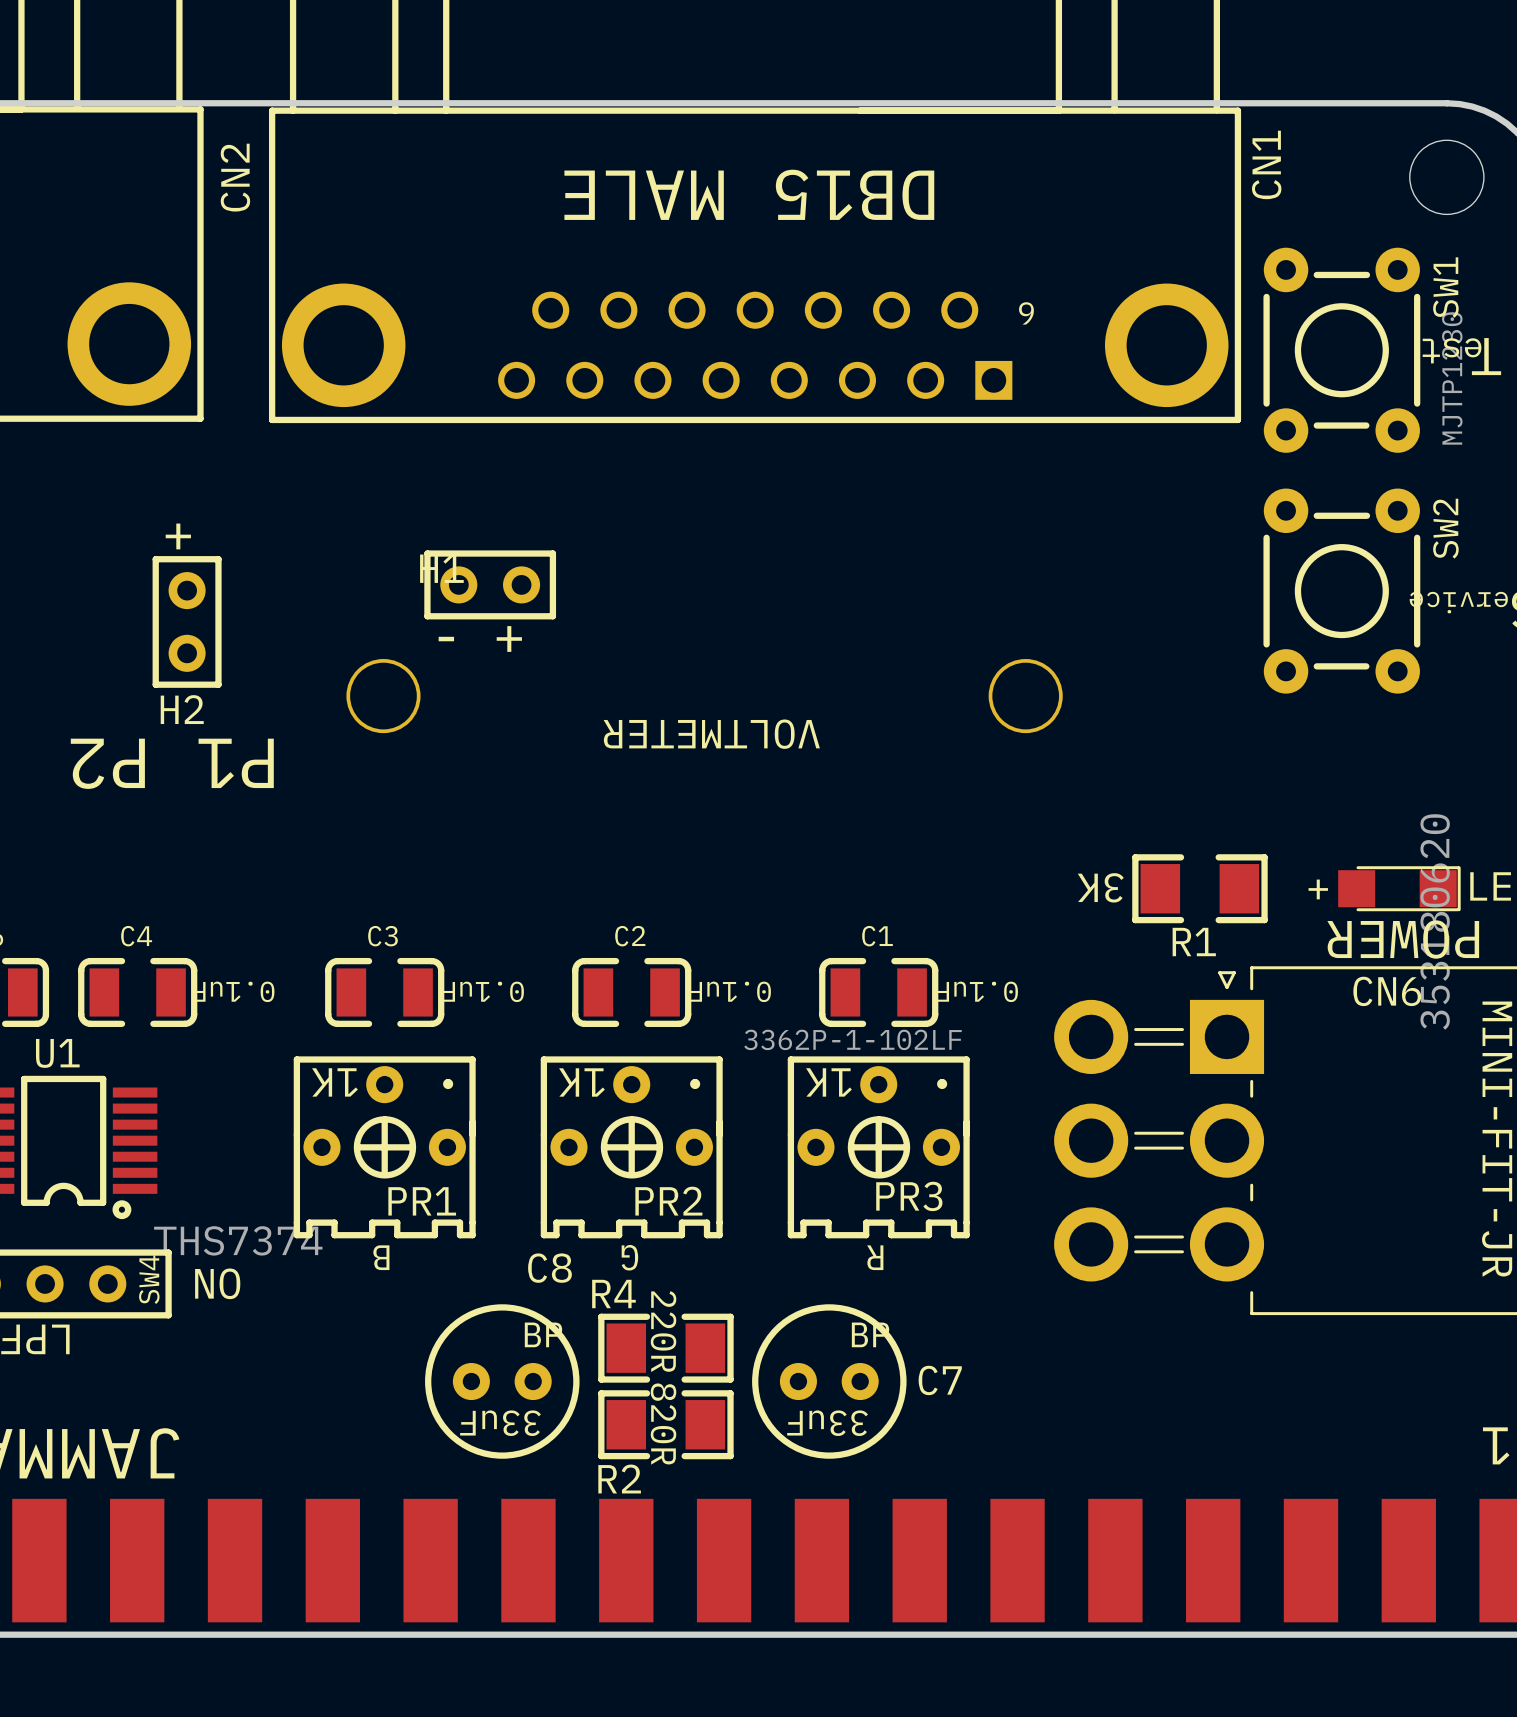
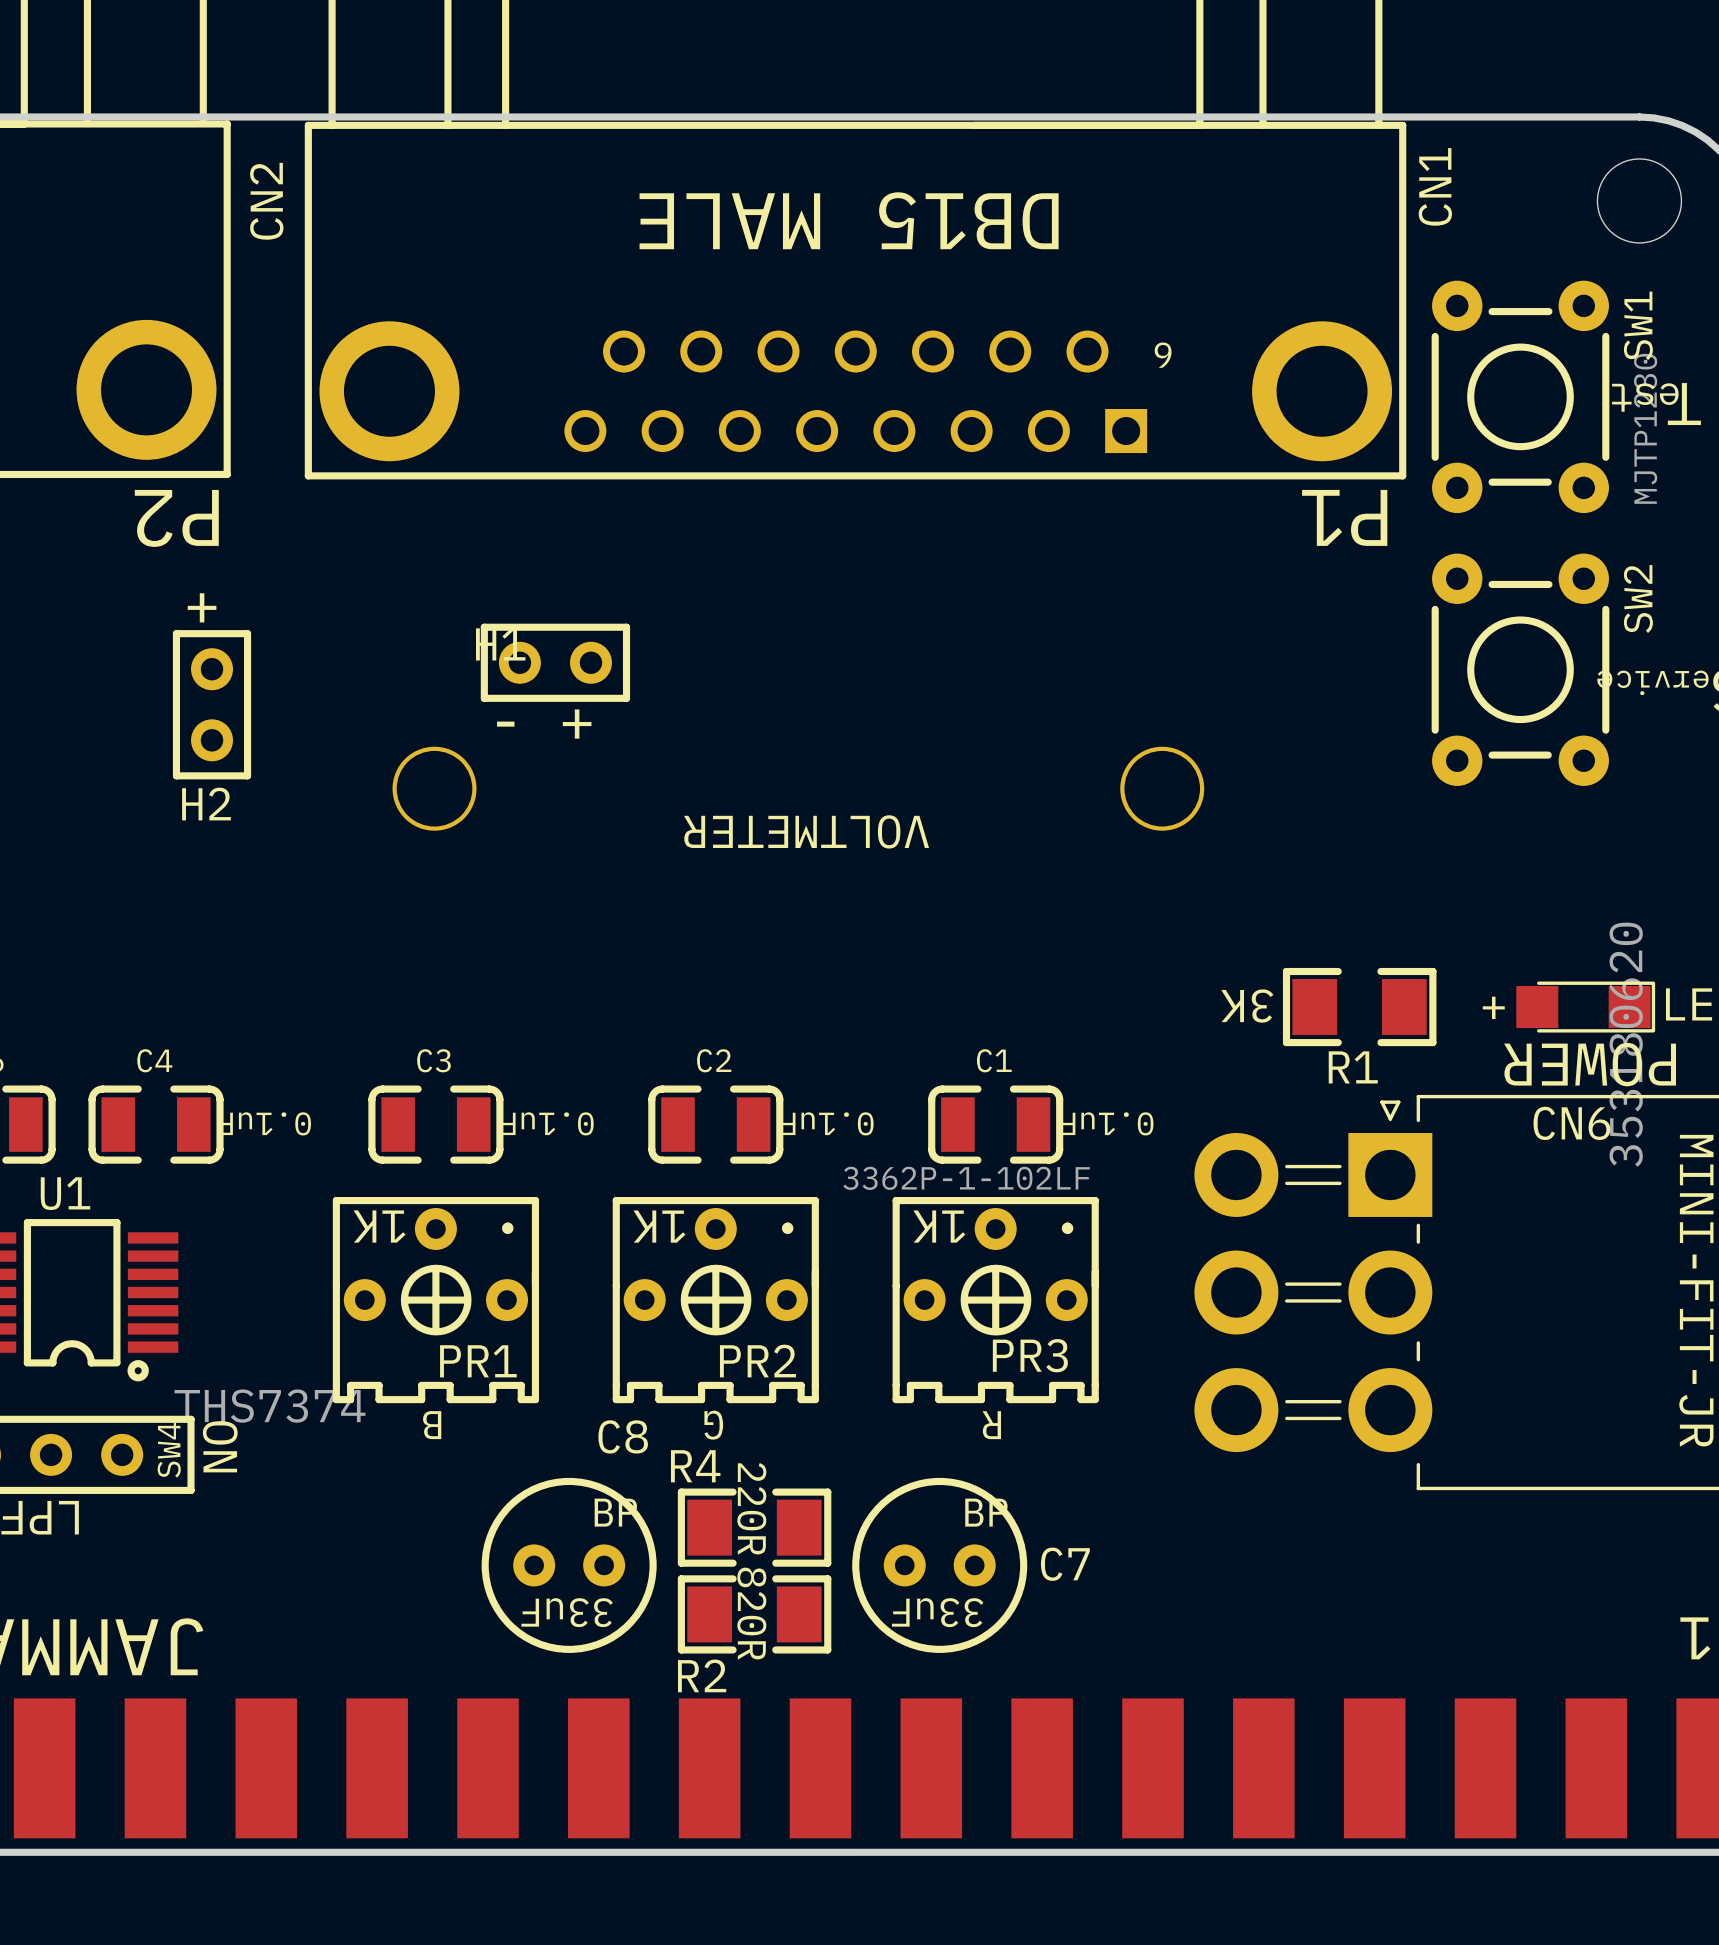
text: none -> P1 (1344, 517)
text position: P2 (107, 763) -> P2 (176, 518)
text: P1 (236, 763) -> none
text rotation: 0° (217, 1283) -> 90° counterclockwise (220, 1446)

